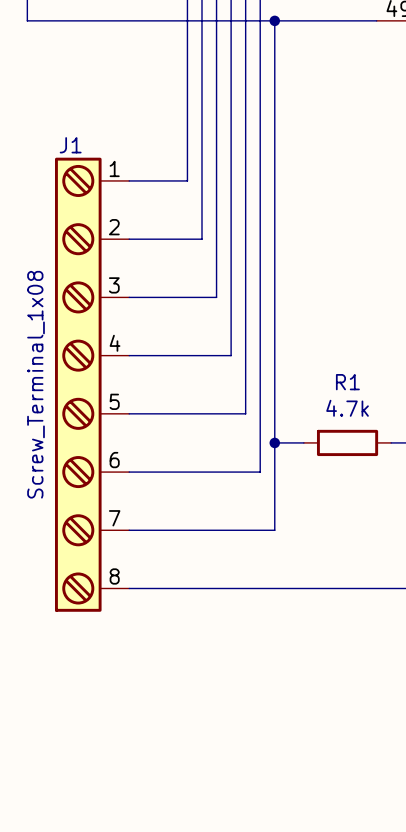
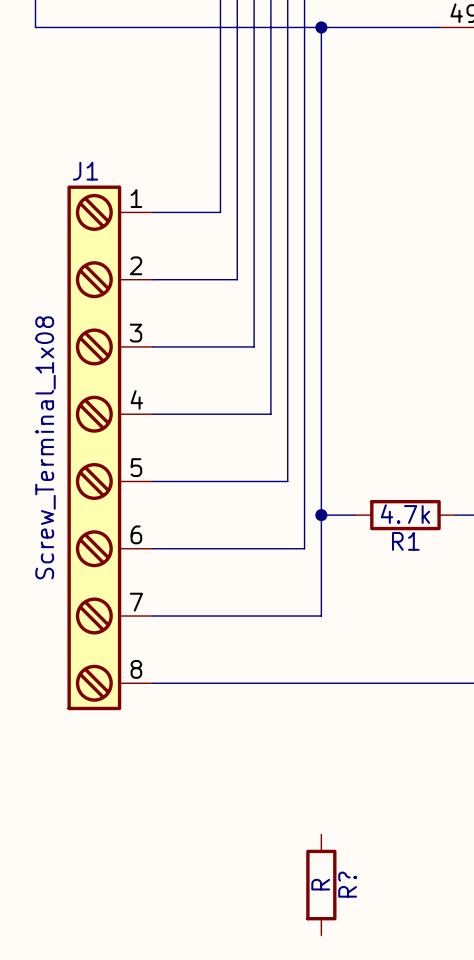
R1 name position: R1 (347, 382) -> R1 (405, 541)
R1 value position: 4.7k (347, 408) -> 4.7k (405, 514)
R?: none -> R (321, 885)

